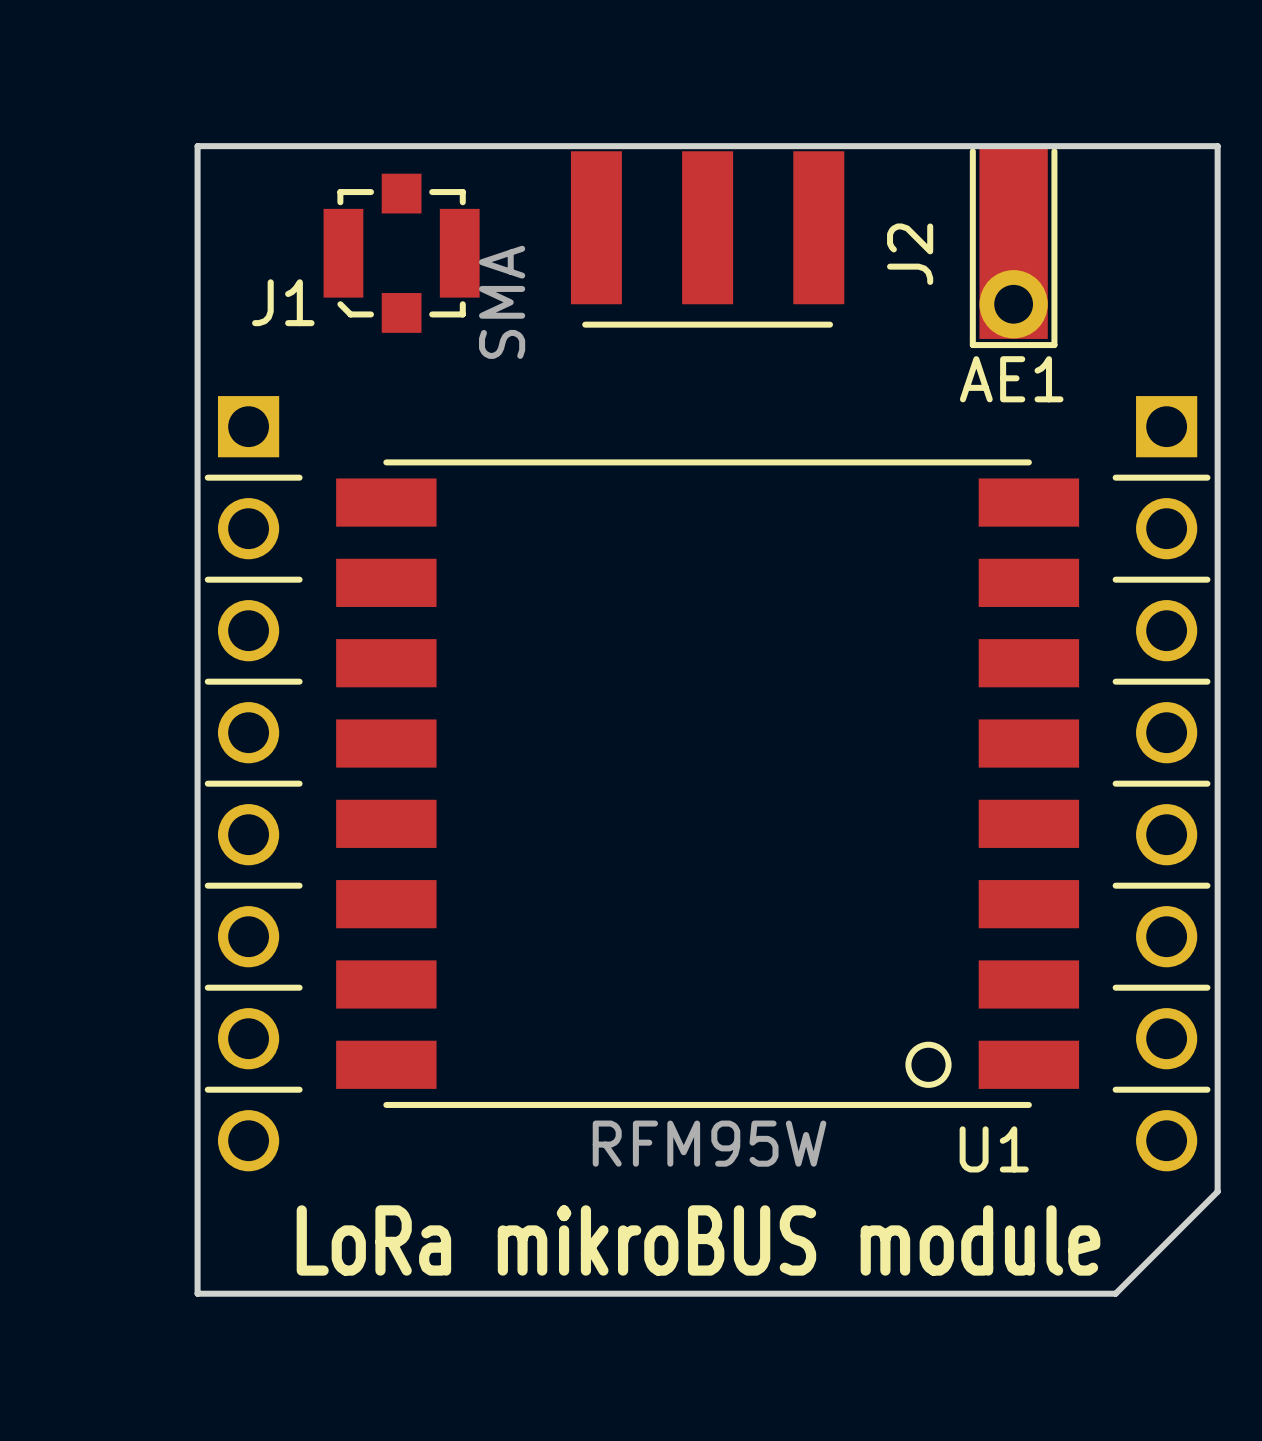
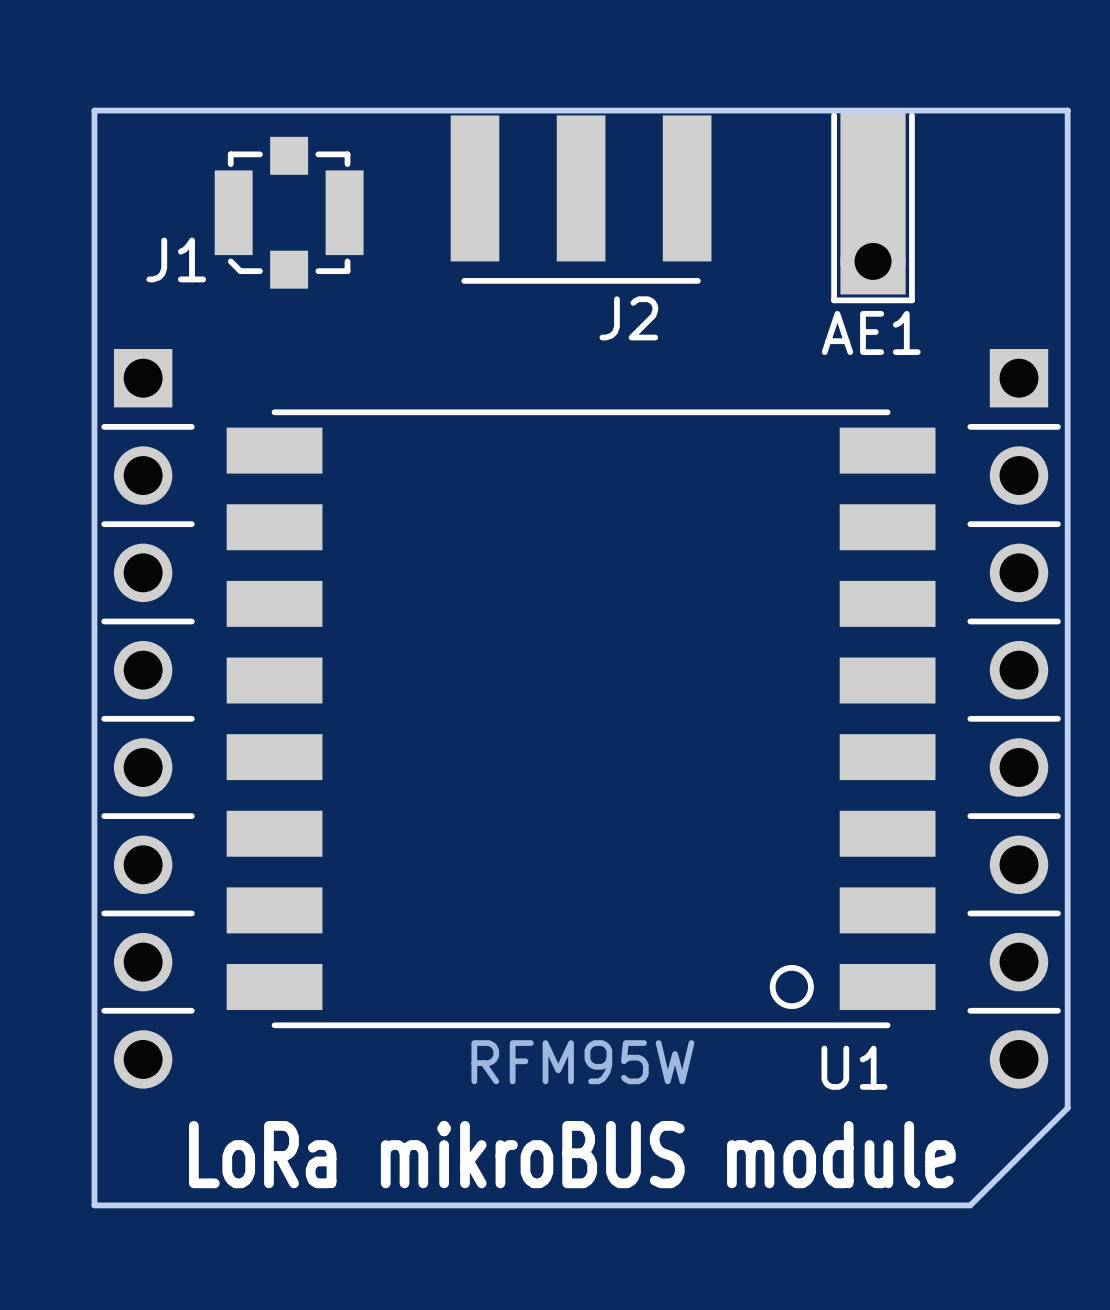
J2 footprint: [570, 151, 845, 328] -> [450, 115, 712, 284]
J2 name position: J2 (910, 254) -> J2 (628, 318)
J2 value: SMA (502, 302) -> none

